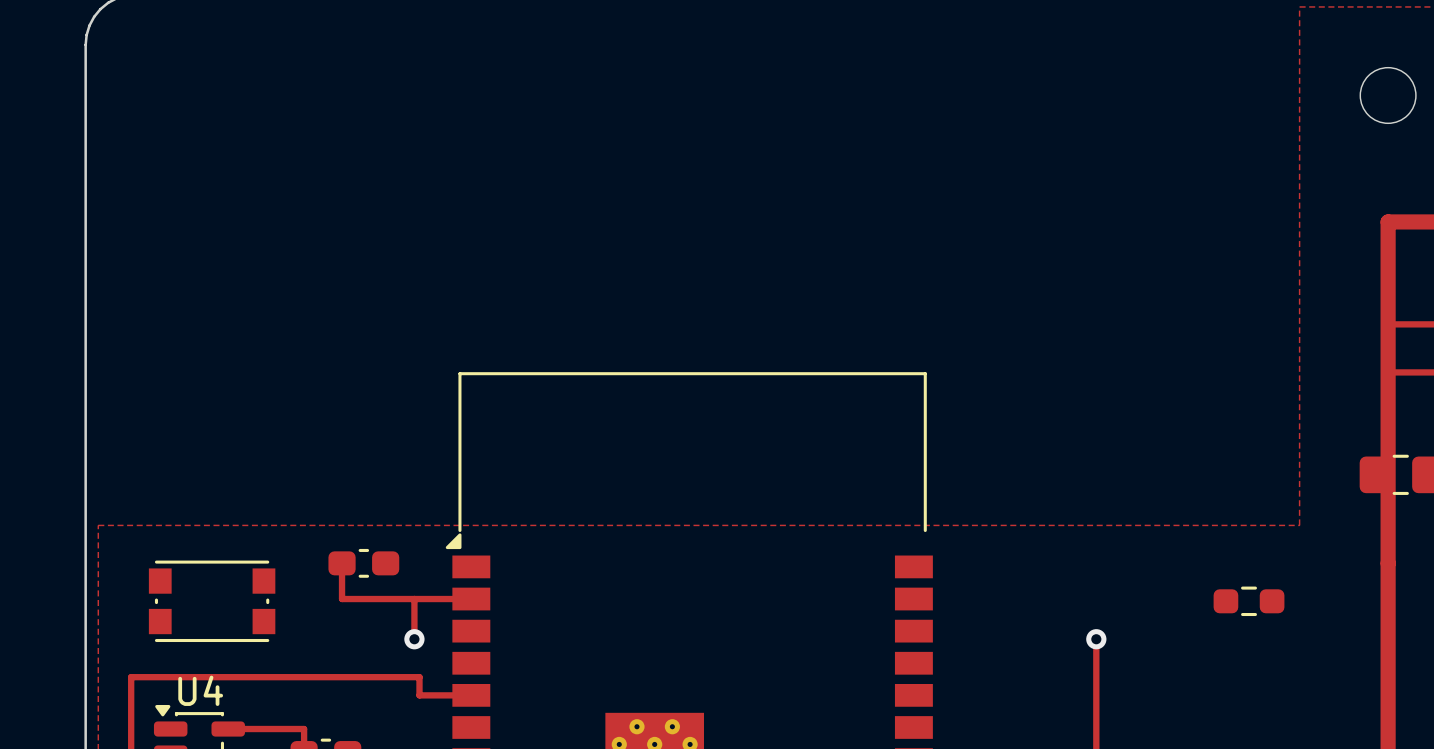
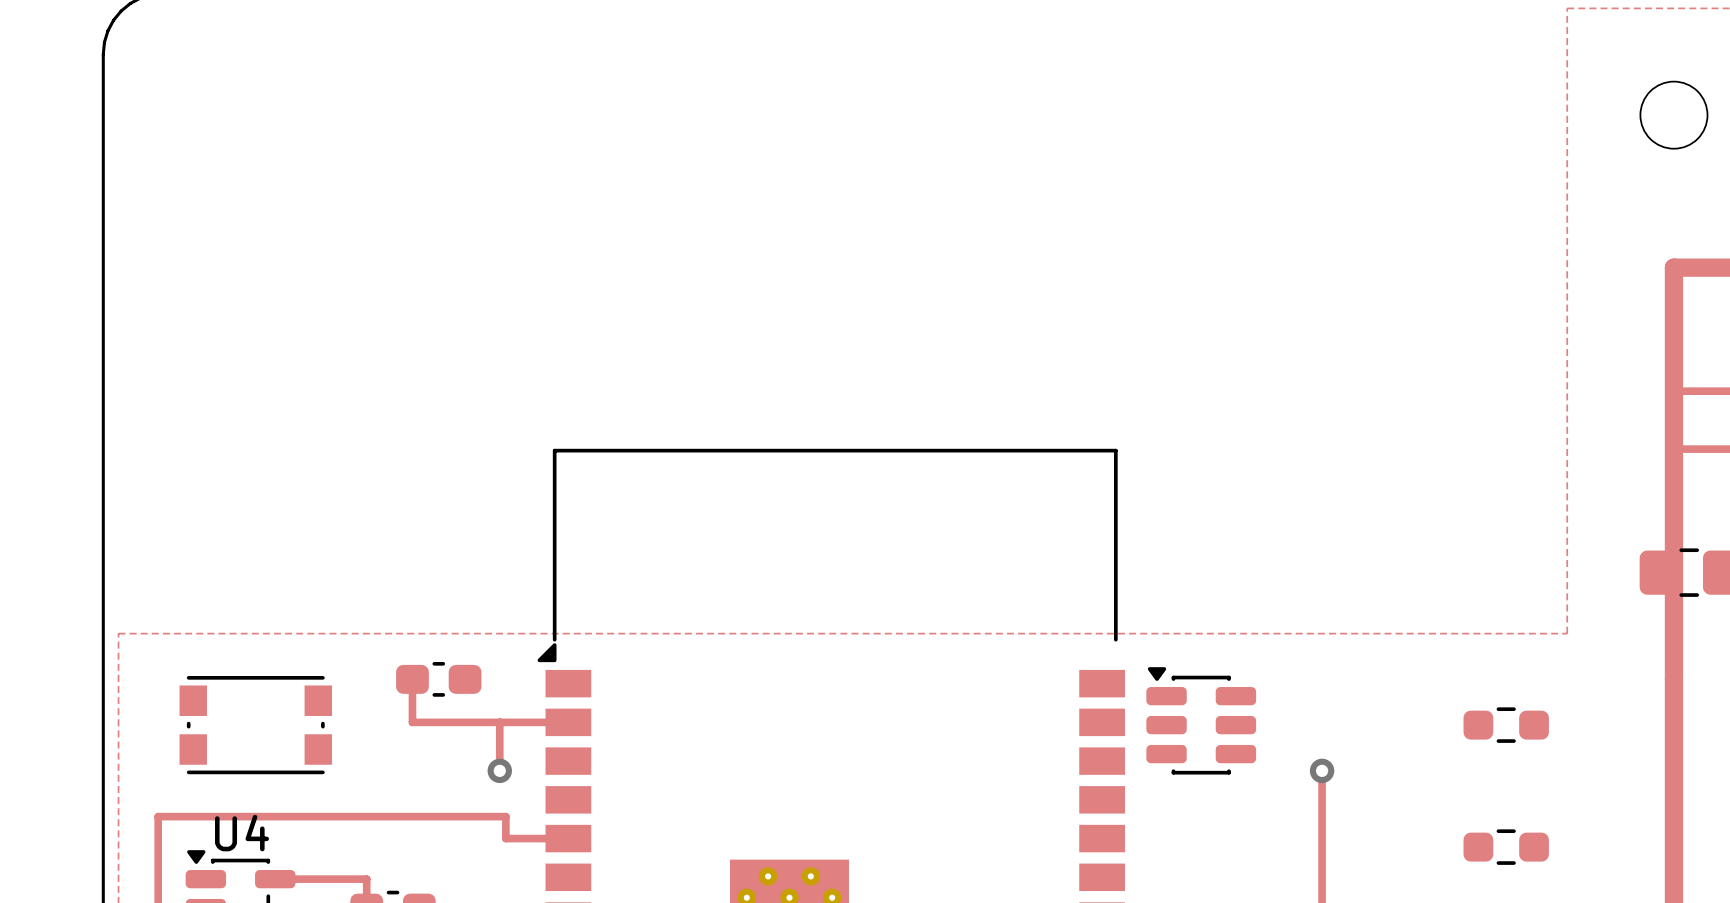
part: none -> (1201, 720)
part: none -> (1506, 847)

